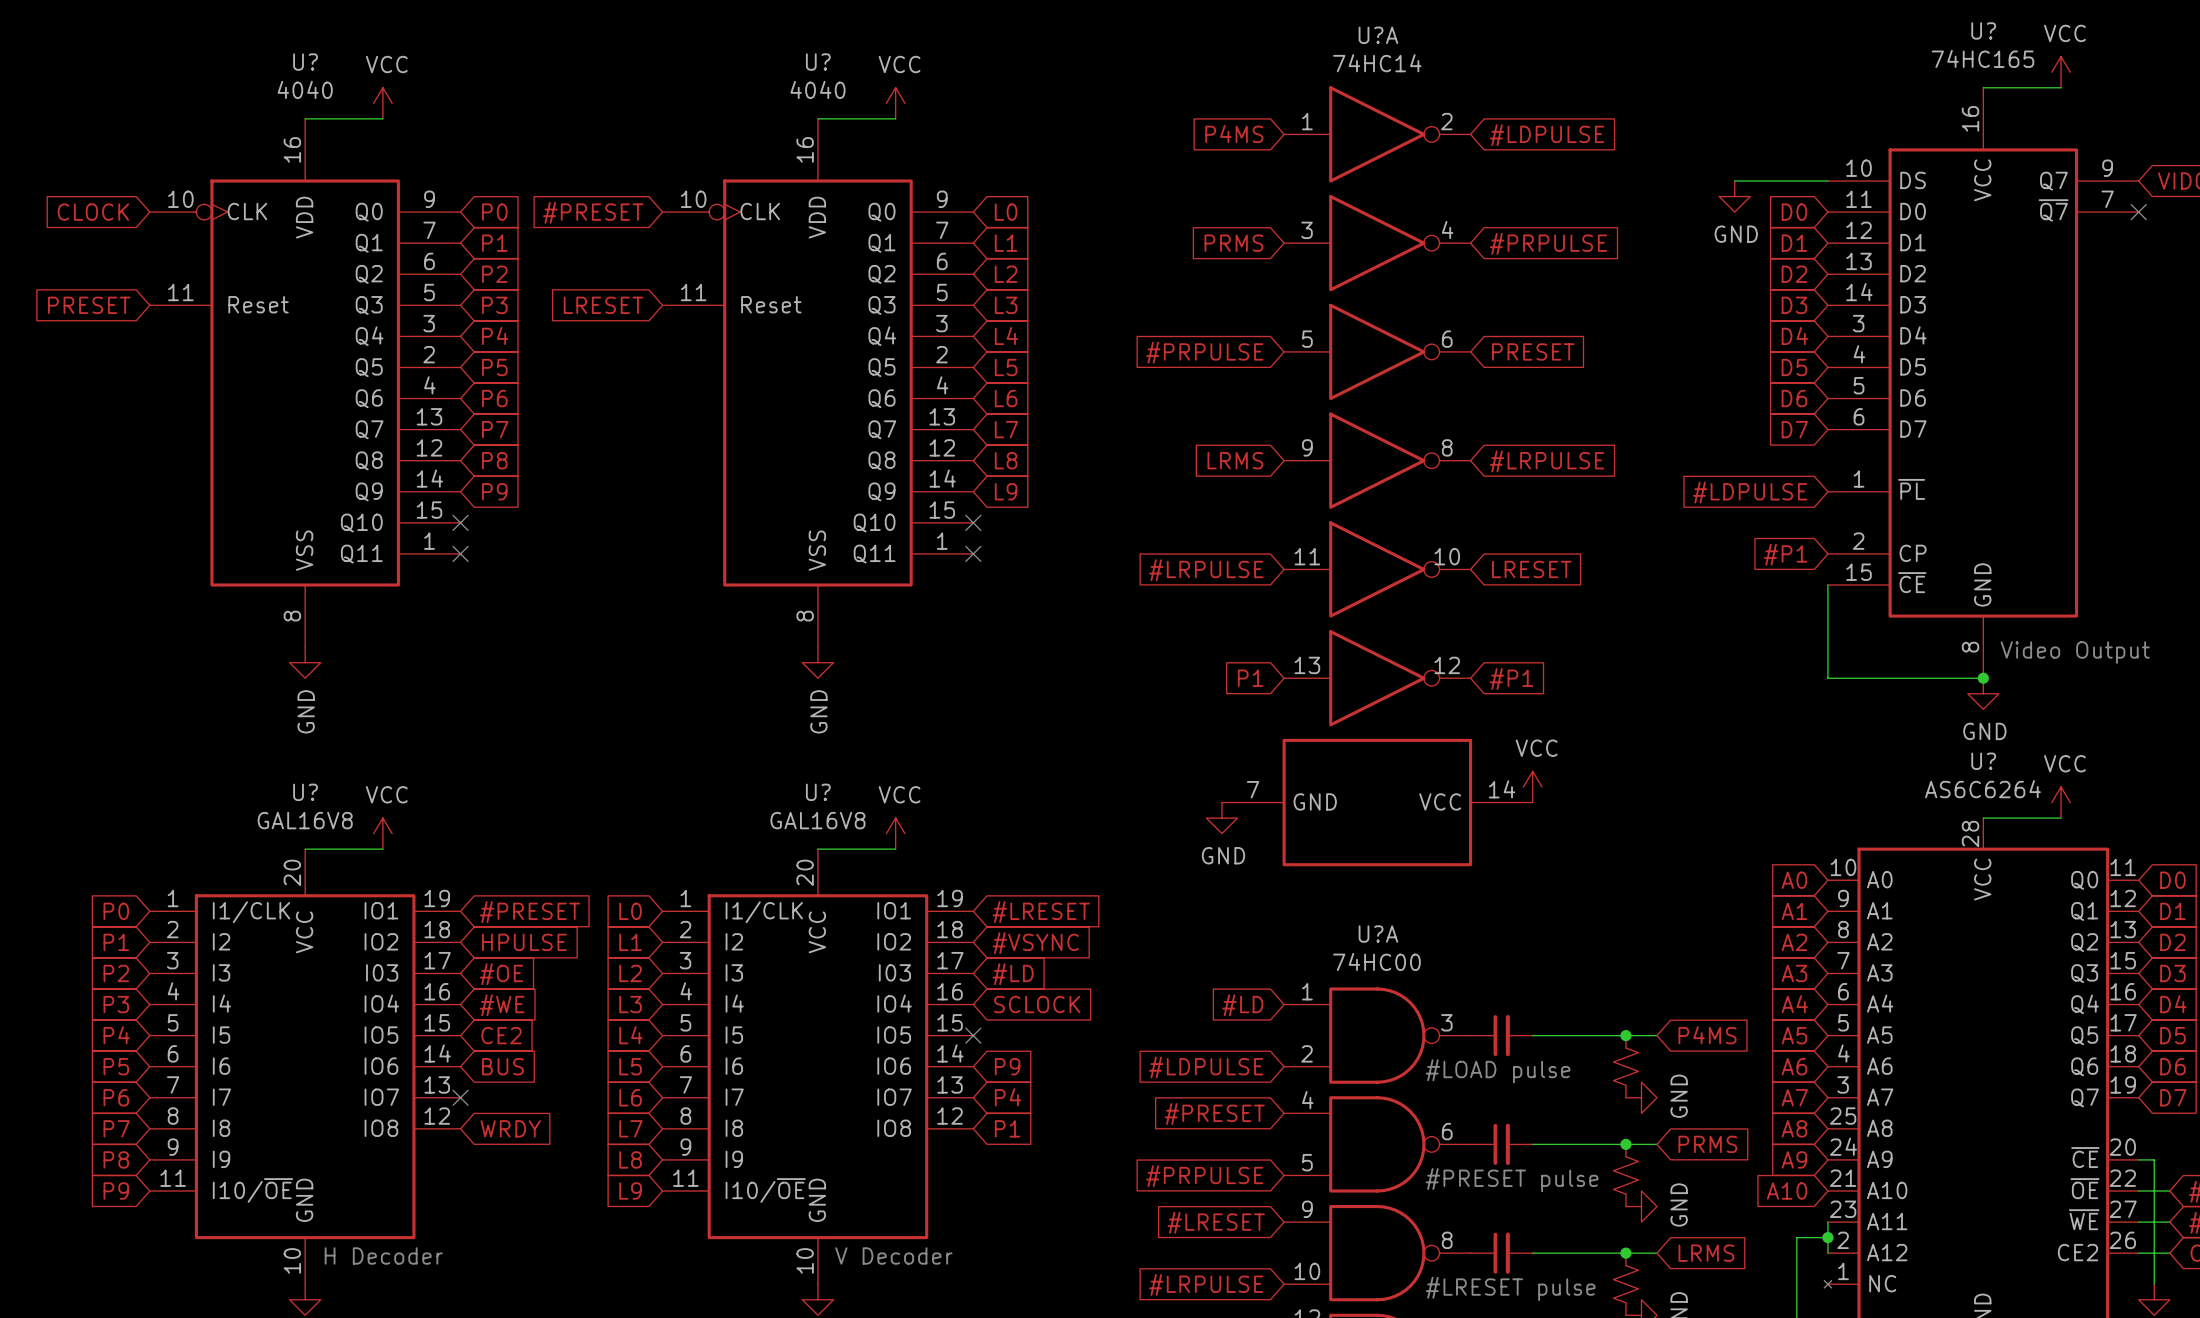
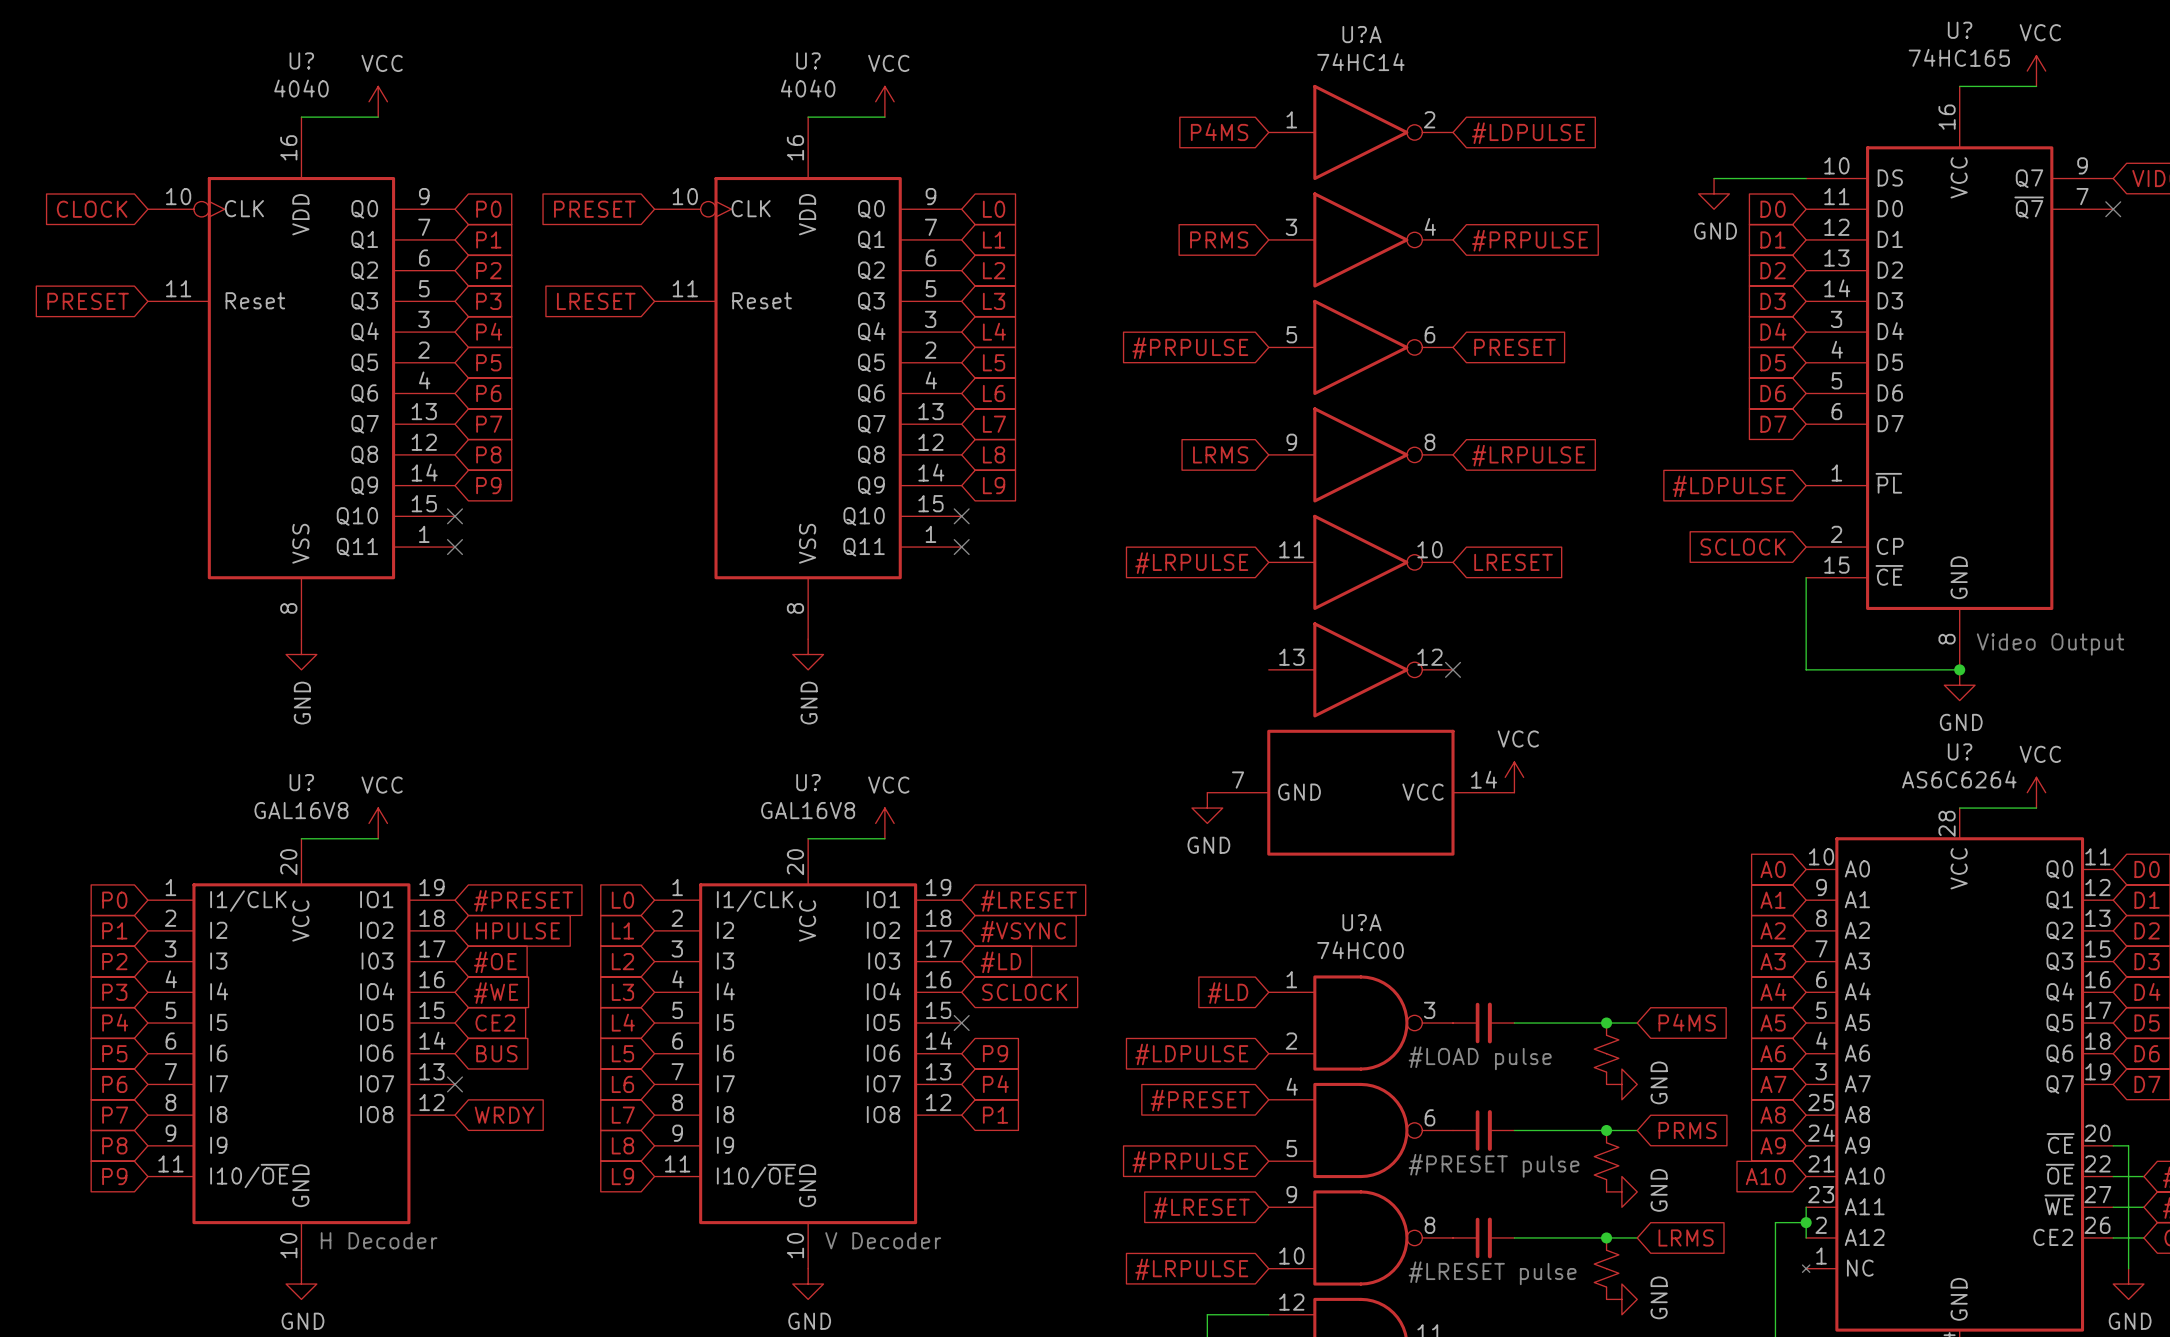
global label: #PRESET (593, 212) -> PRESET (594, 209)
global label: #P1 (1785, 554) -> SCLOCK (1743, 547)
global label: P1 (1250, 678) -> none
no-connect mark: none -> (1453, 669)
global label: #P1 (1511, 678) -> none

